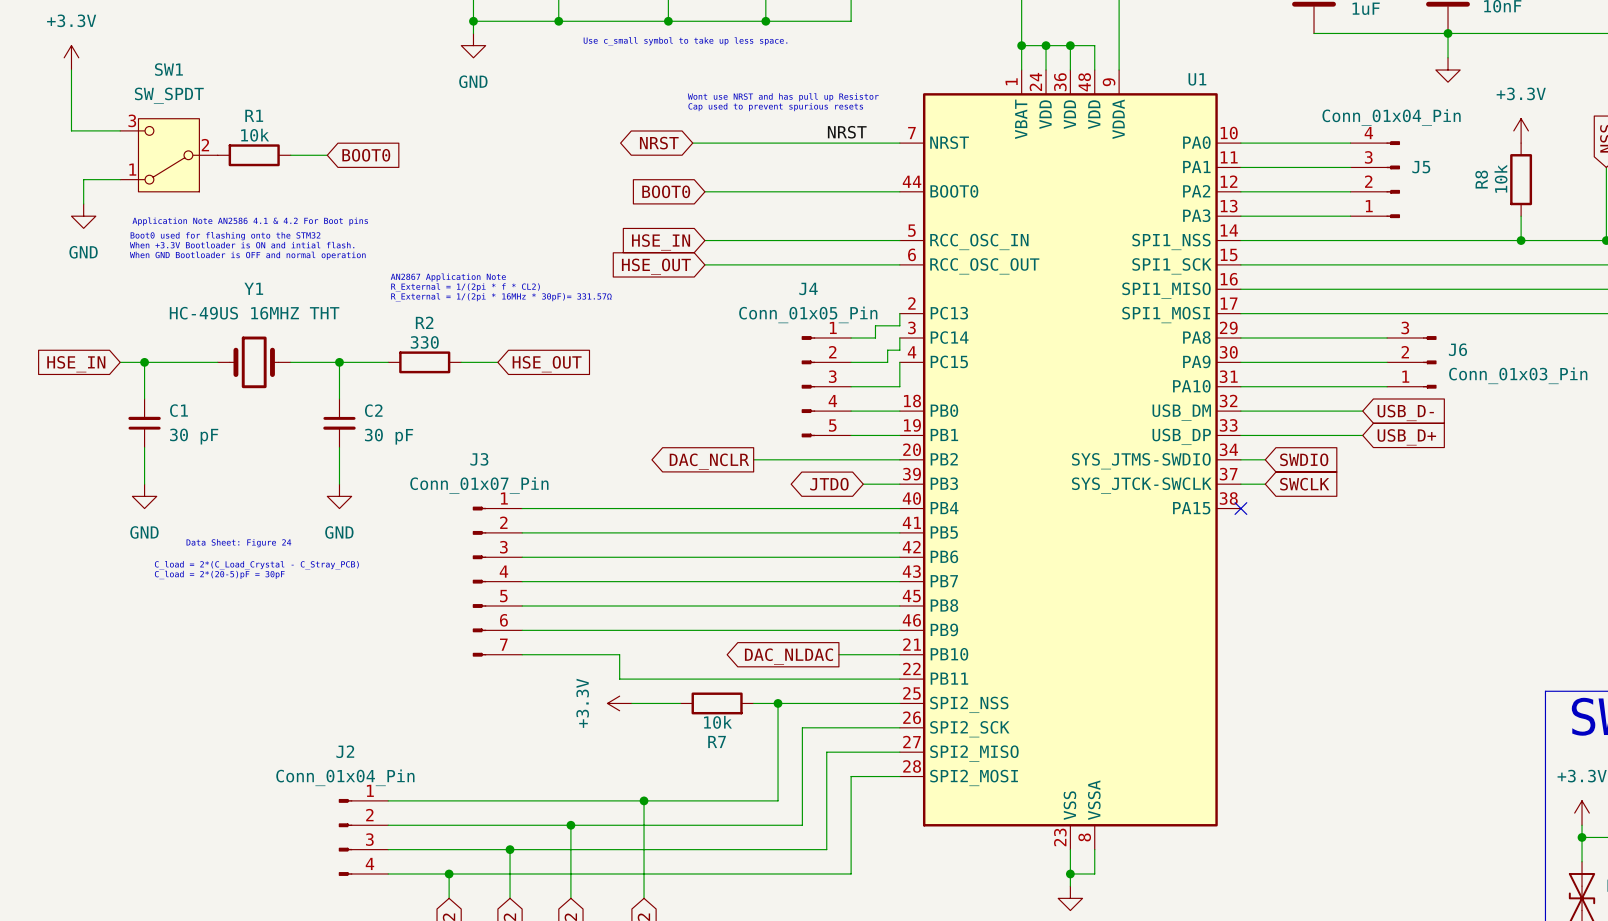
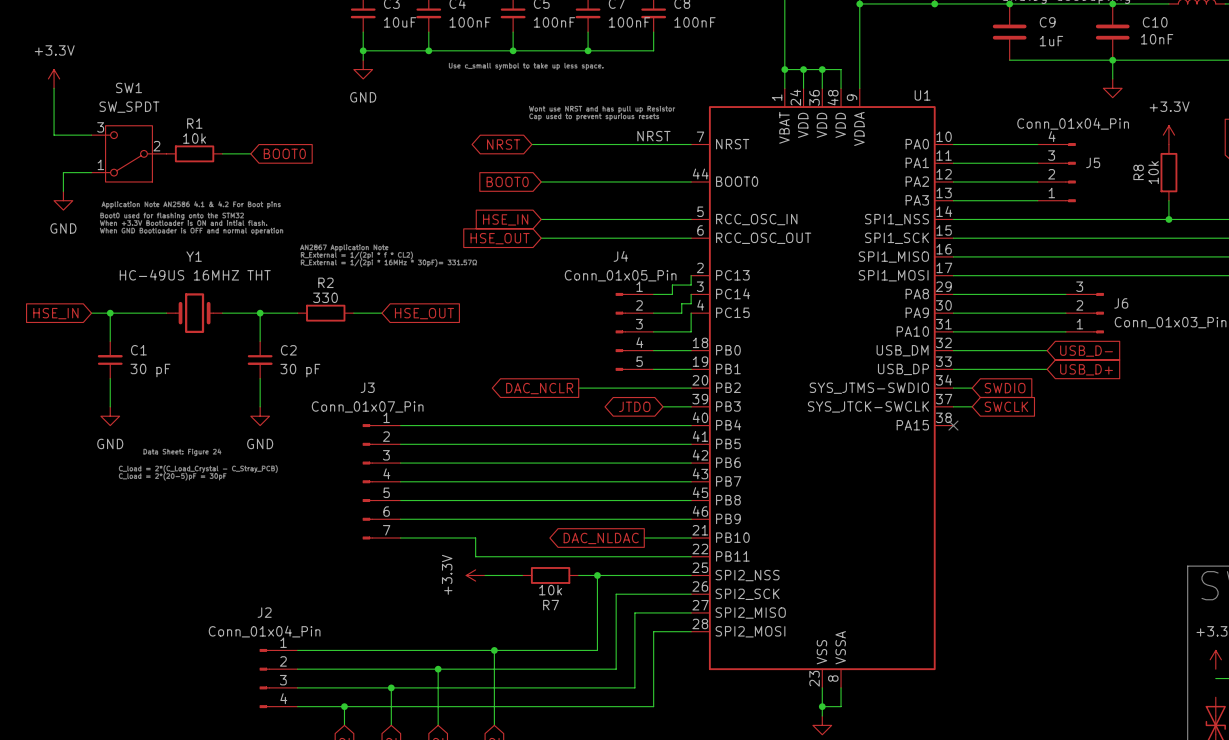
wire: (1582, 825) (1582, 861) -> none
junction: (1582, 837) -> none

